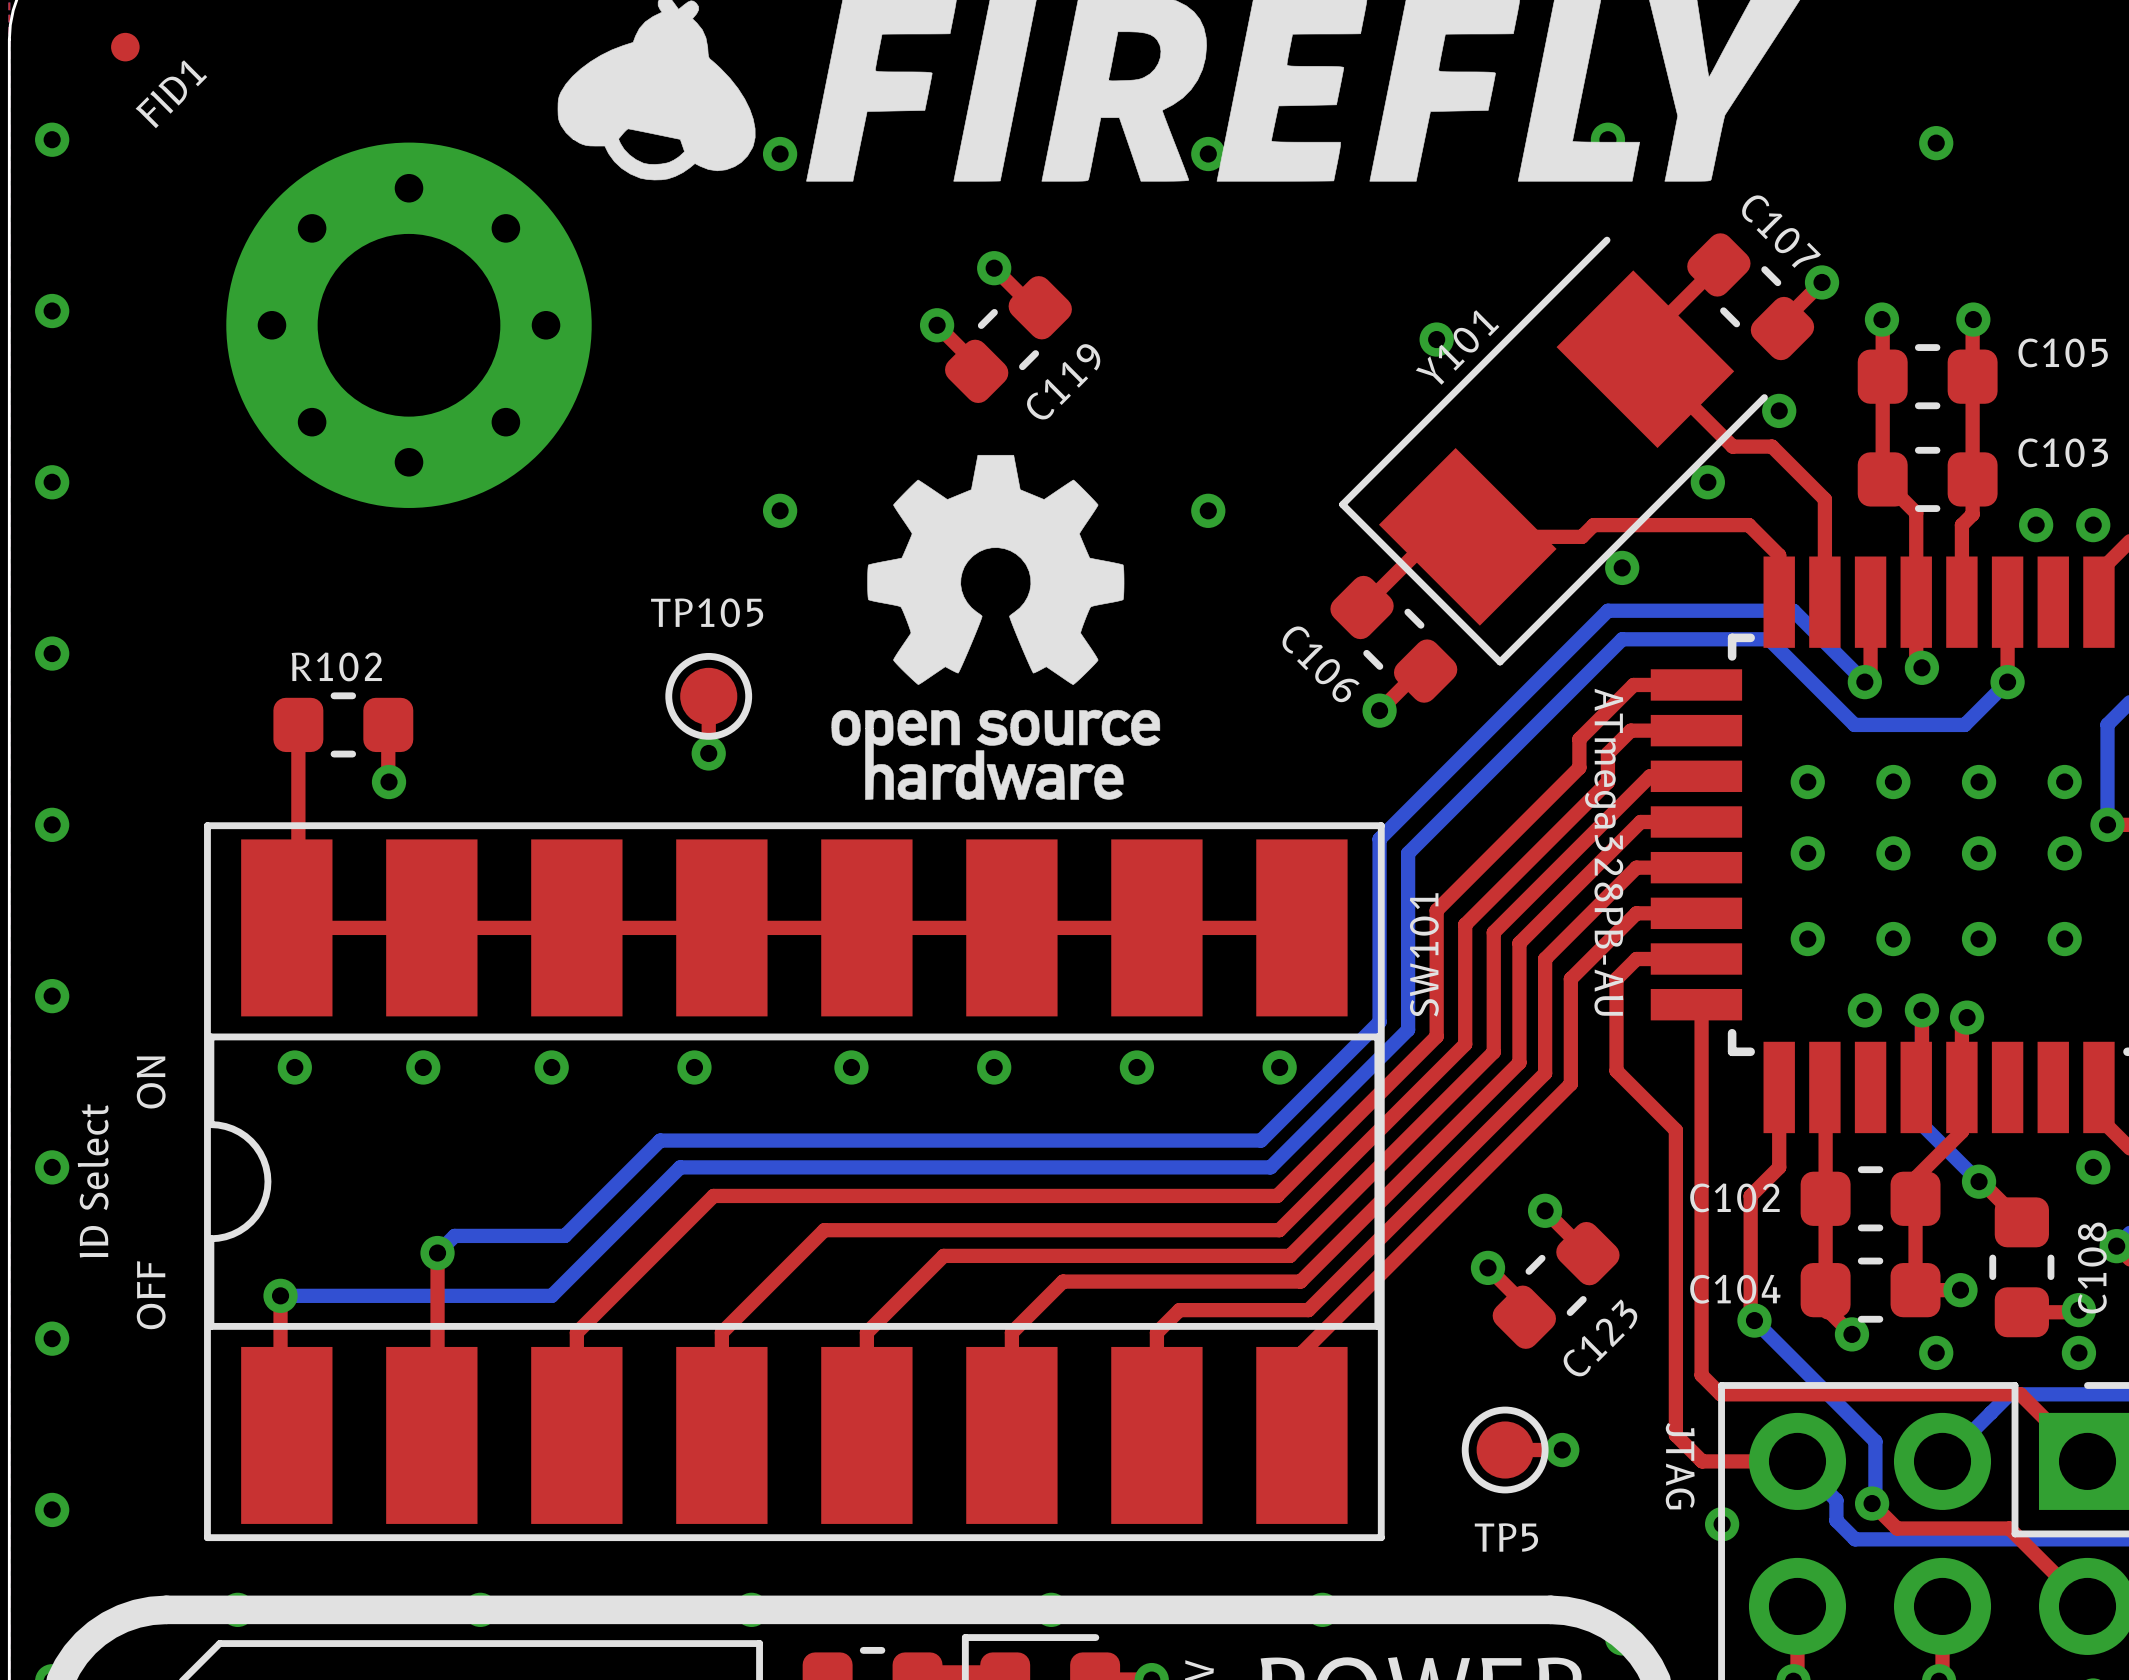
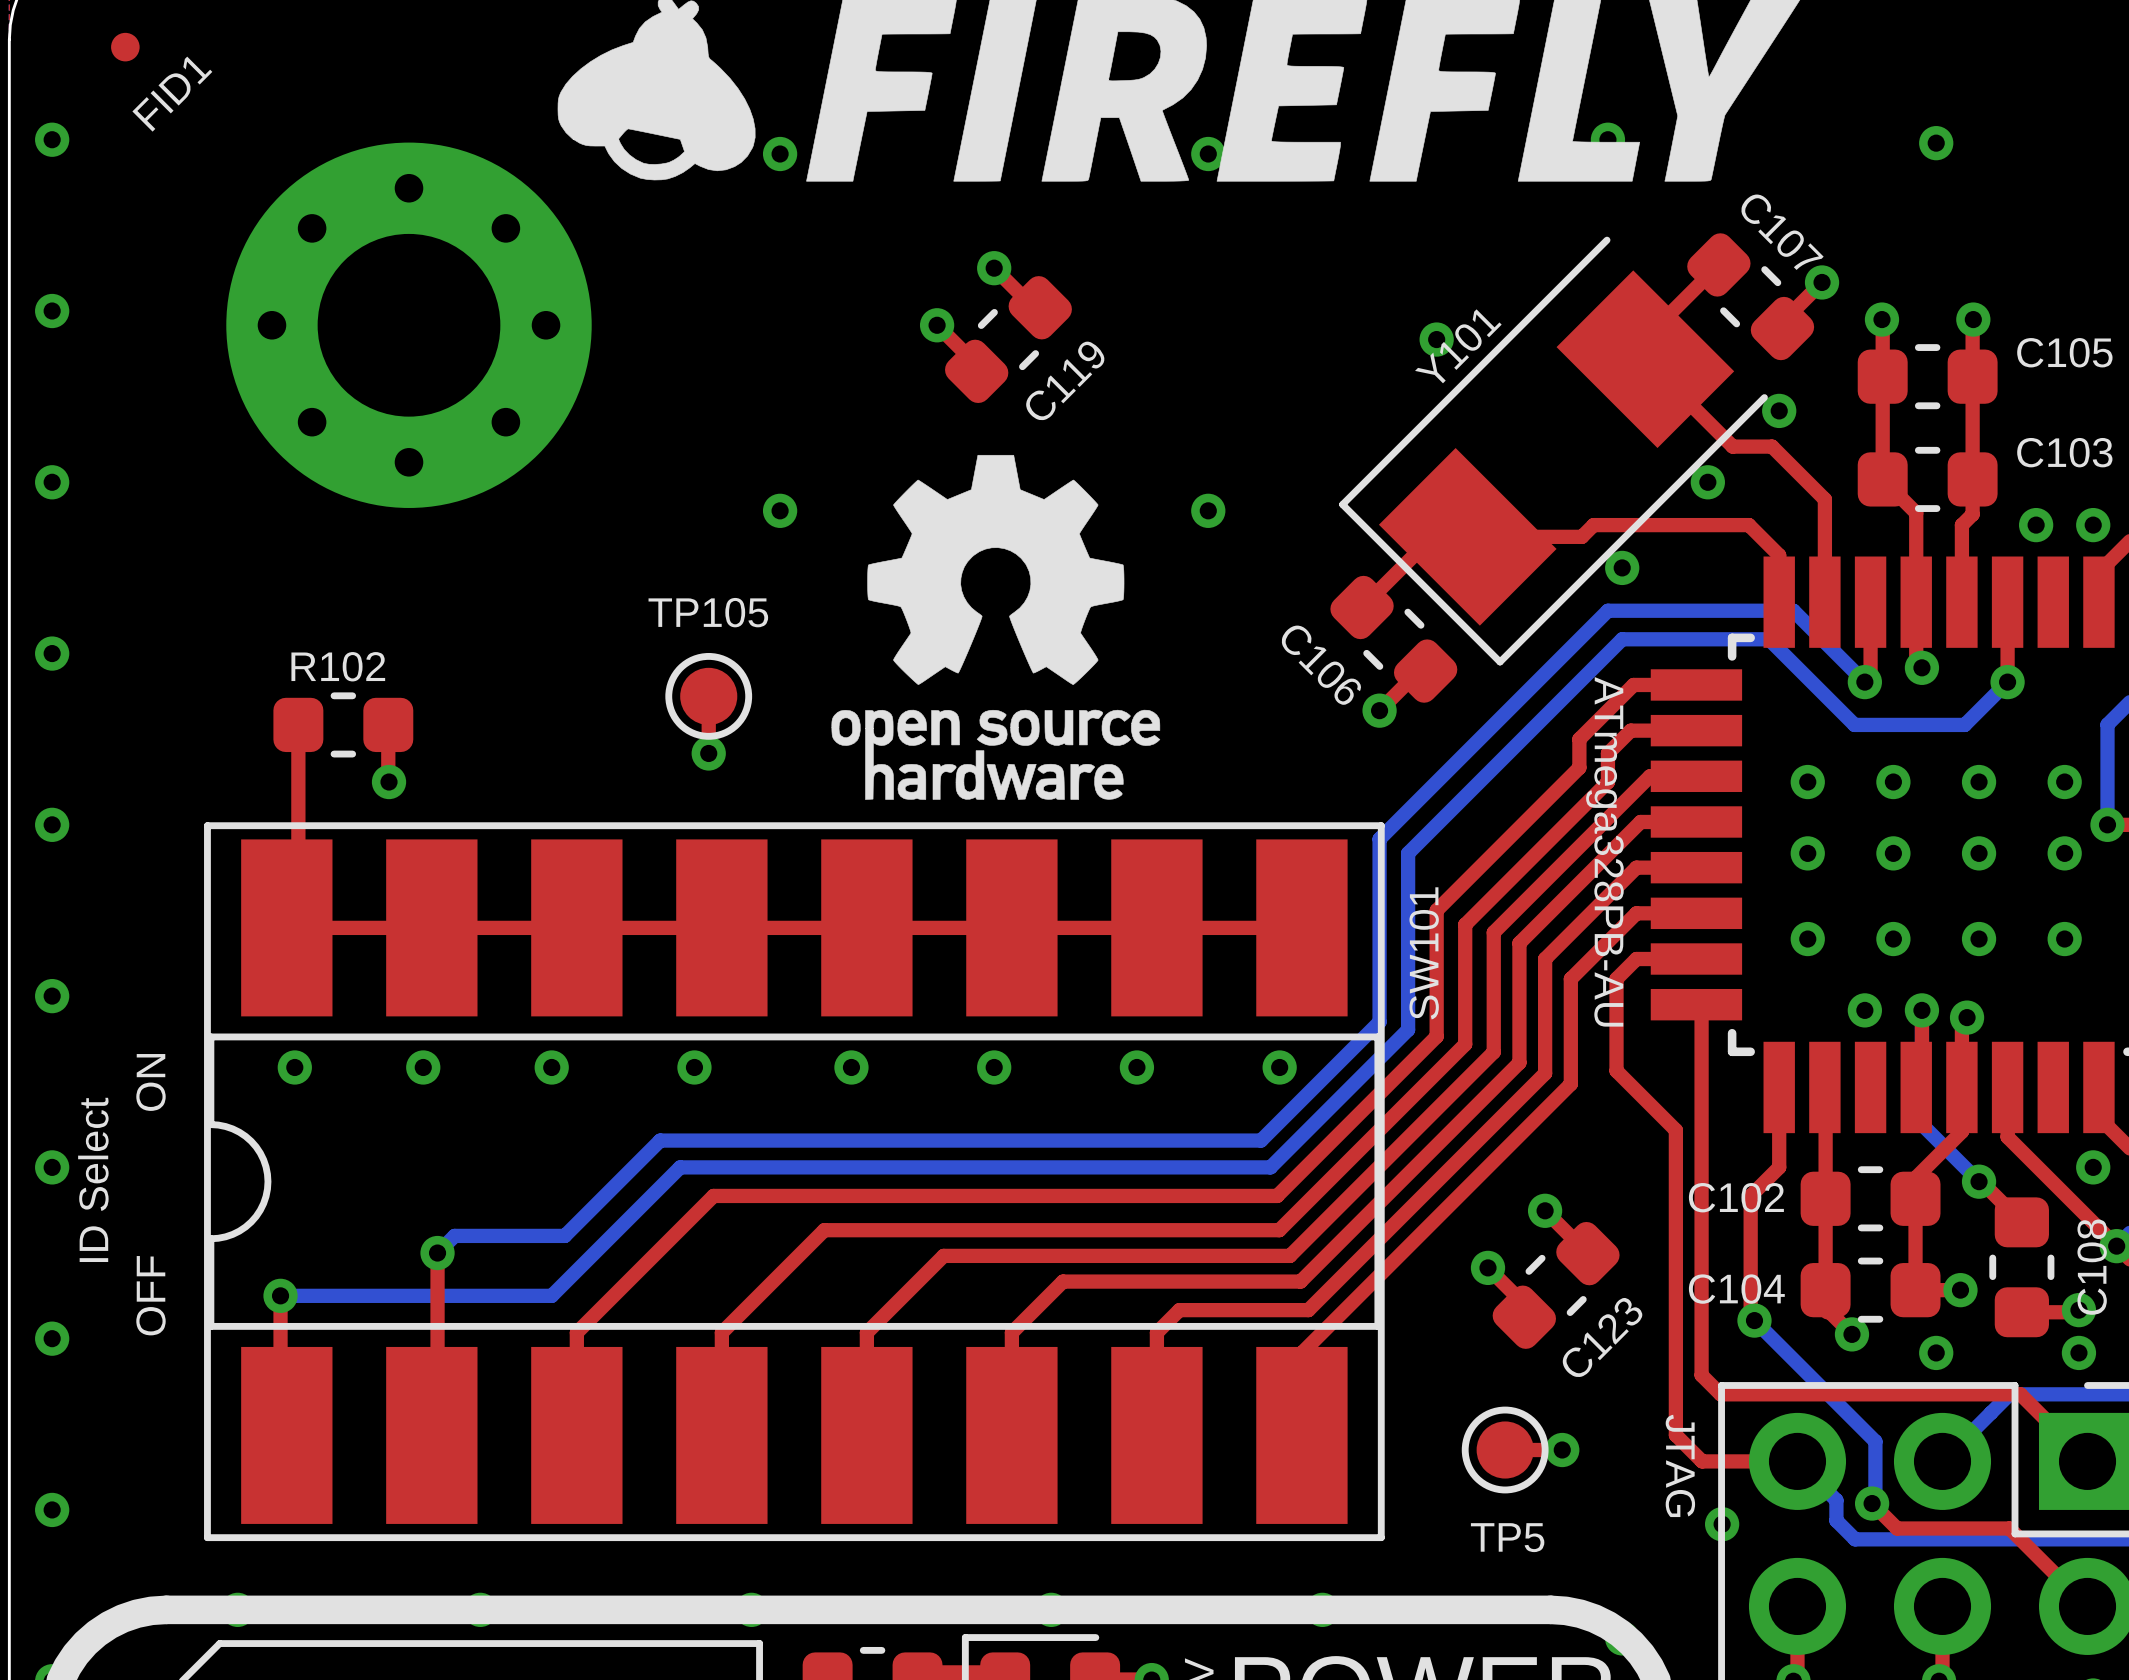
top track: none -> (2007, 1087) (2007, 1137) (2116, 1246)

